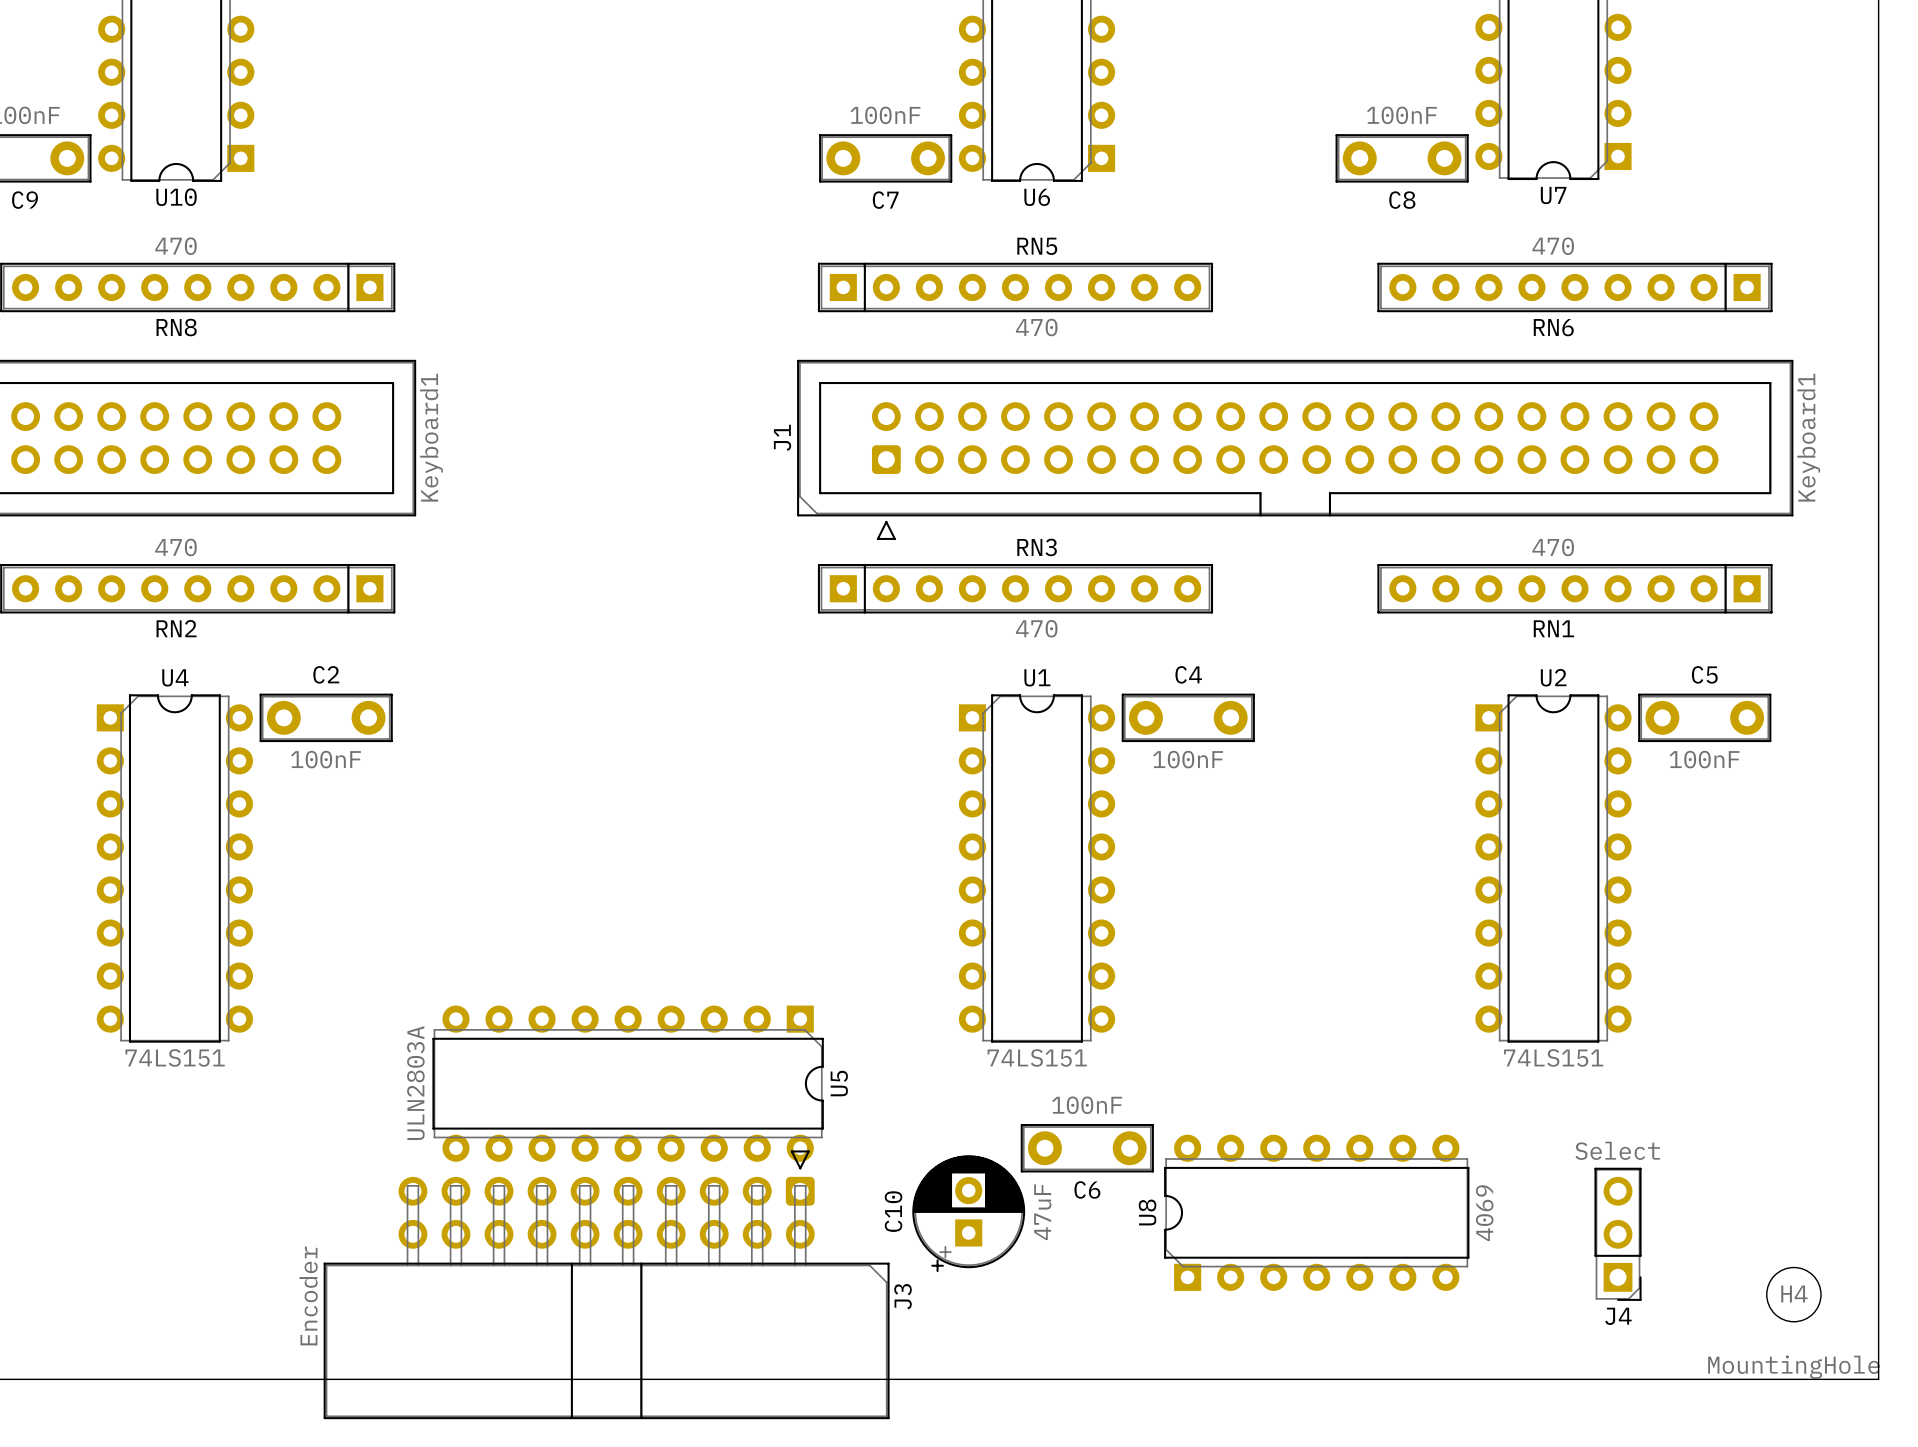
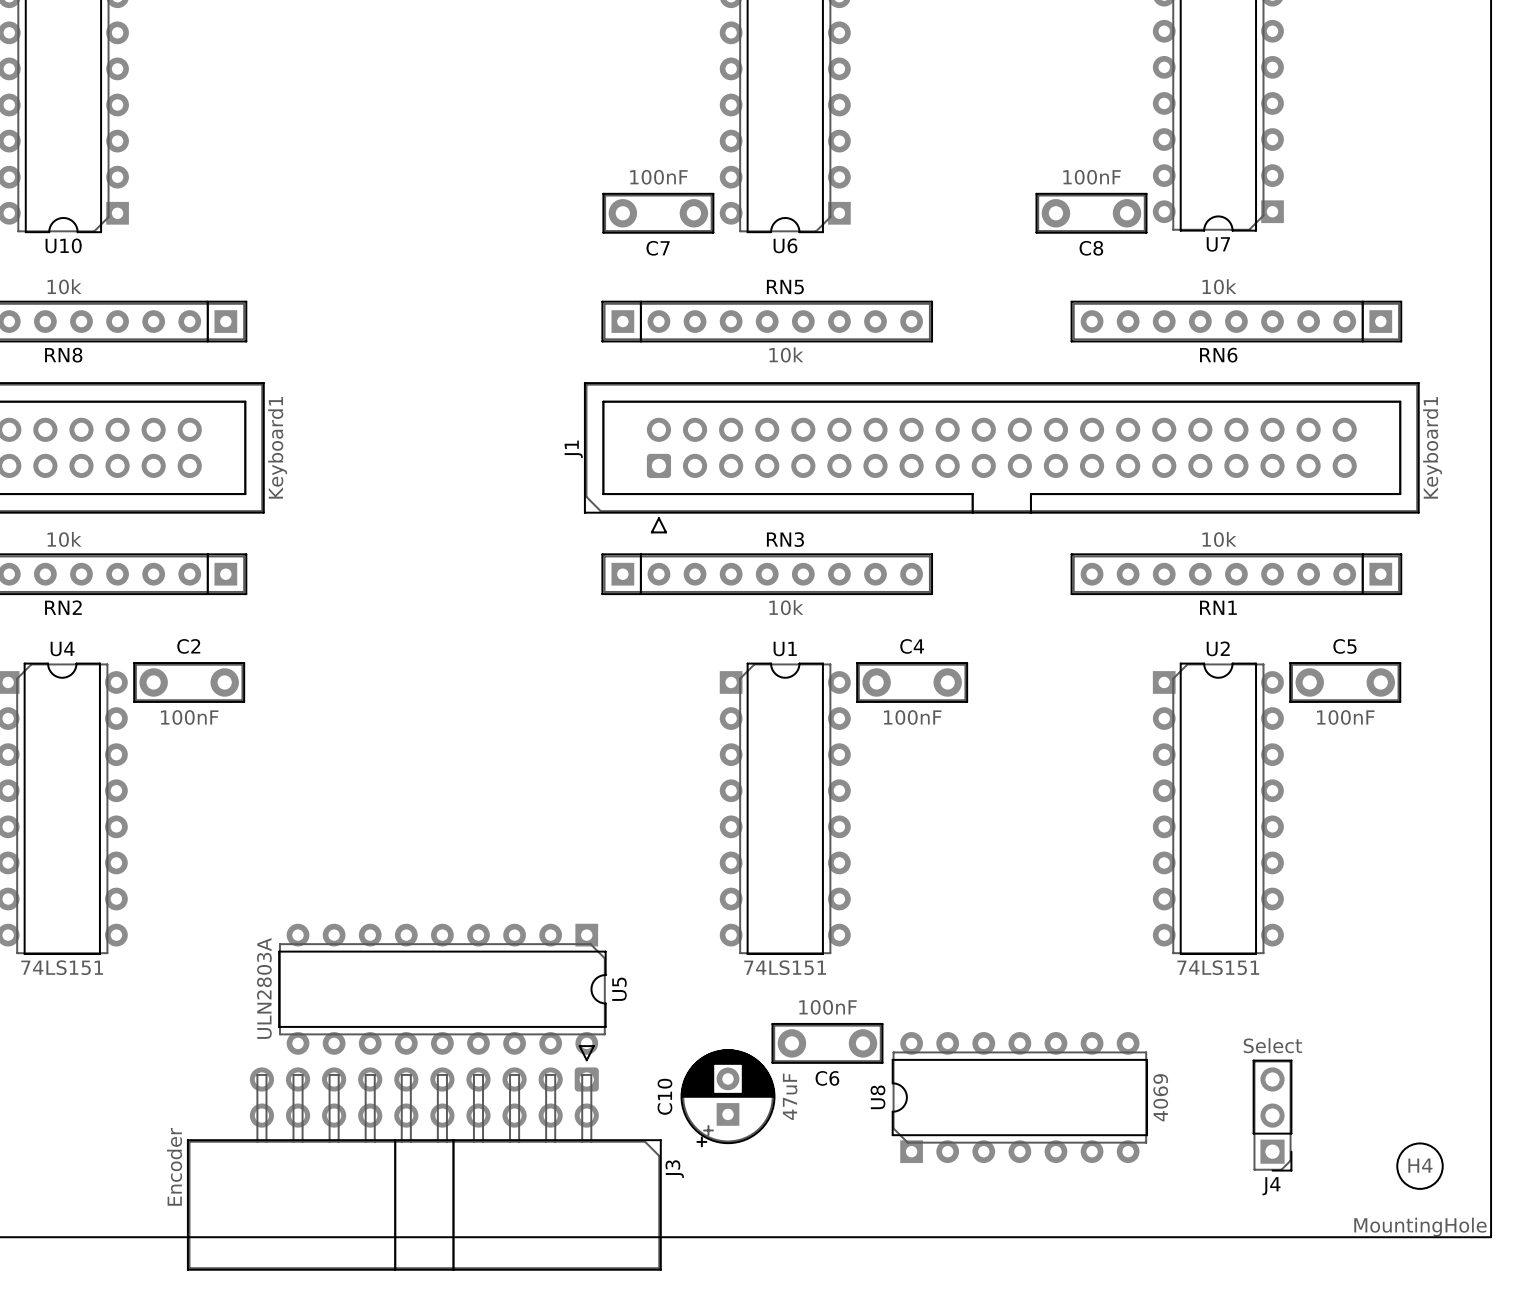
RN8 value: 470 (175, 246) -> 10k (64, 286)
RN6 value: 470 (1553, 246) -> 10k (1219, 286)
RN5 value: 470 (1036, 327) -> 10k (786, 354)
RN2 value: 470 (175, 547) -> 10k (64, 539)
RN1 value: 470 (1553, 547) -> 10k (1219, 539)
RN3 value: 470 (1036, 628) -> 10k (786, 607)

